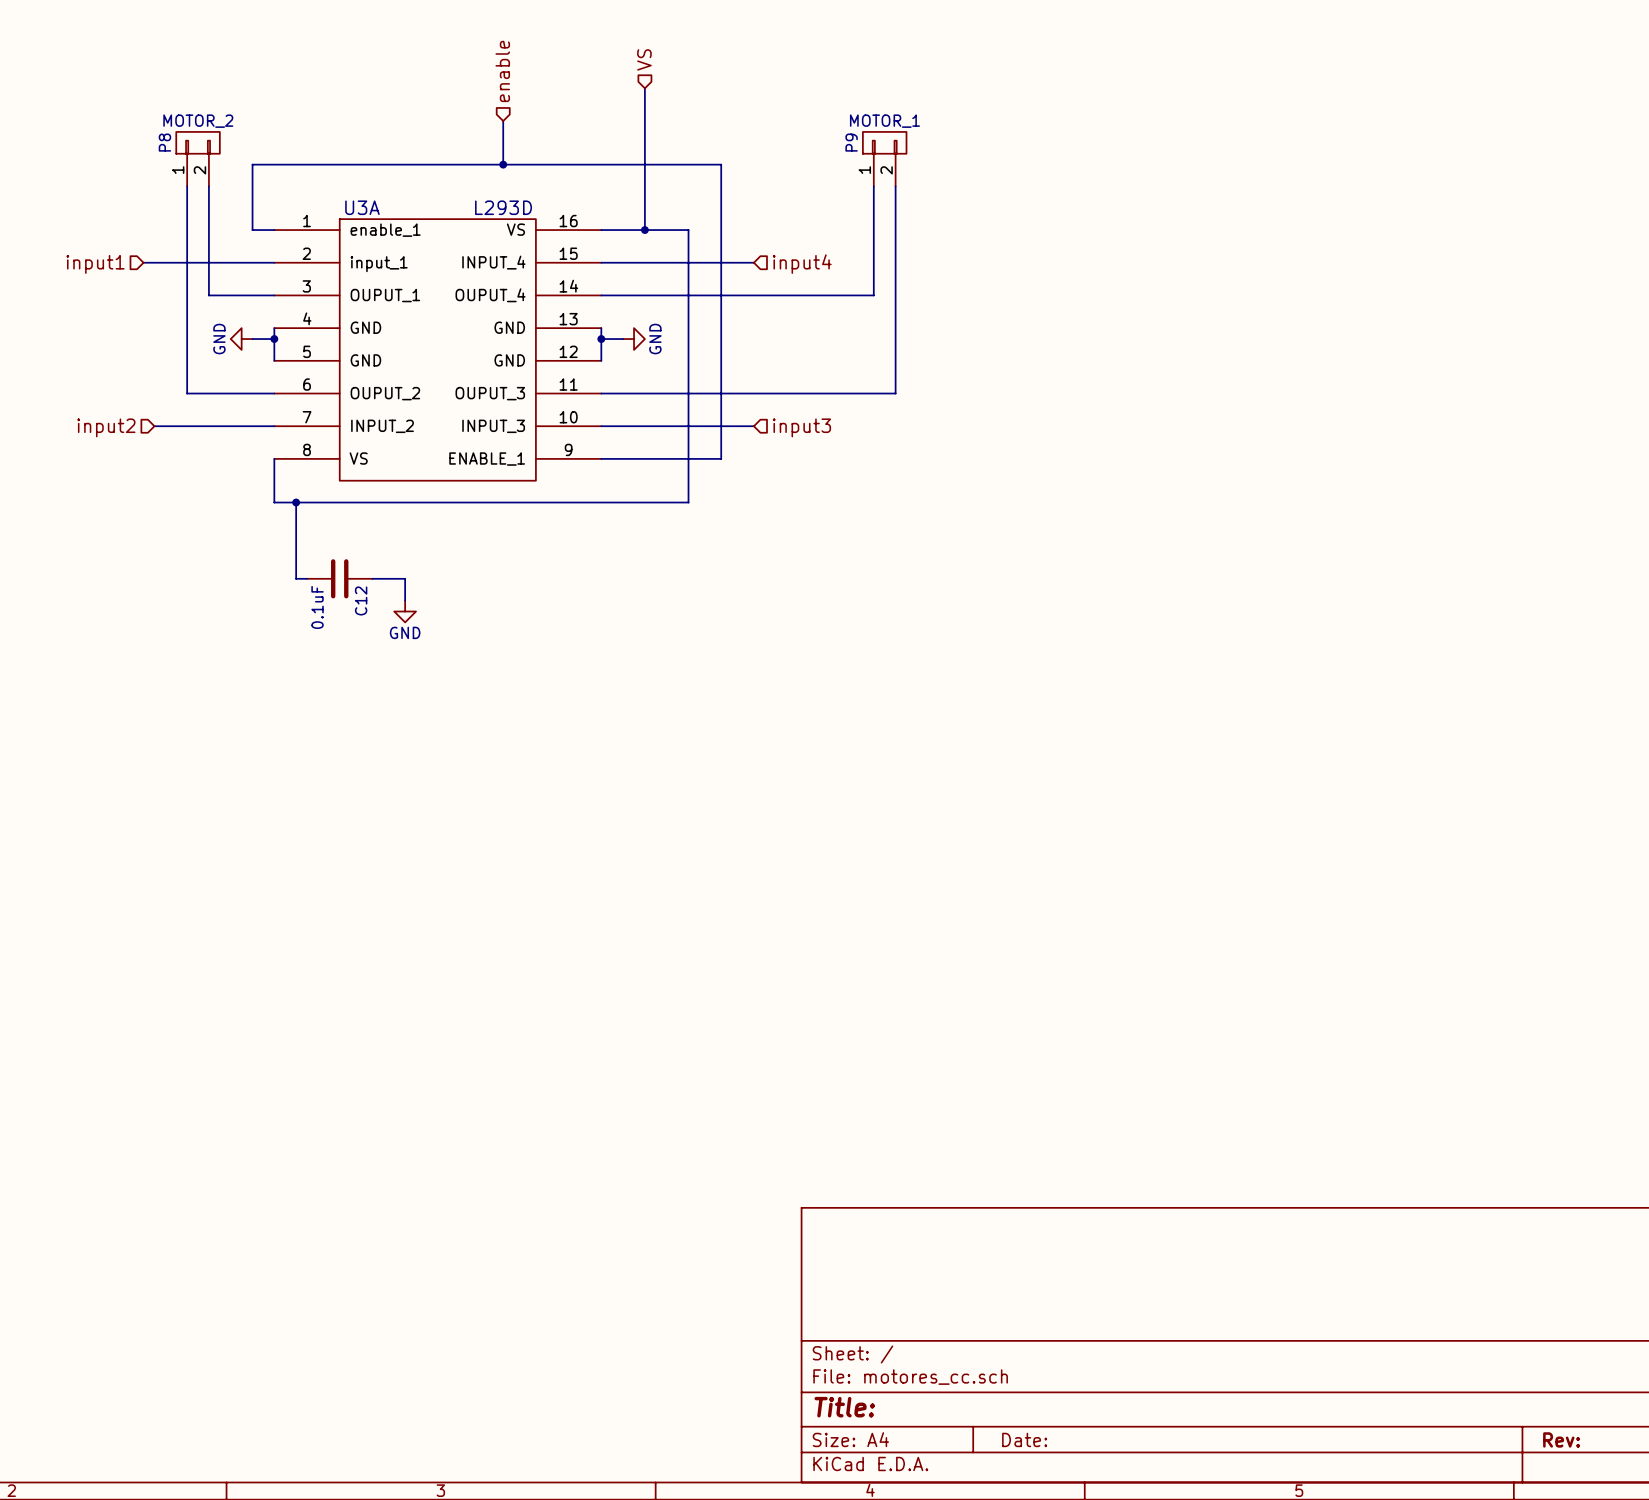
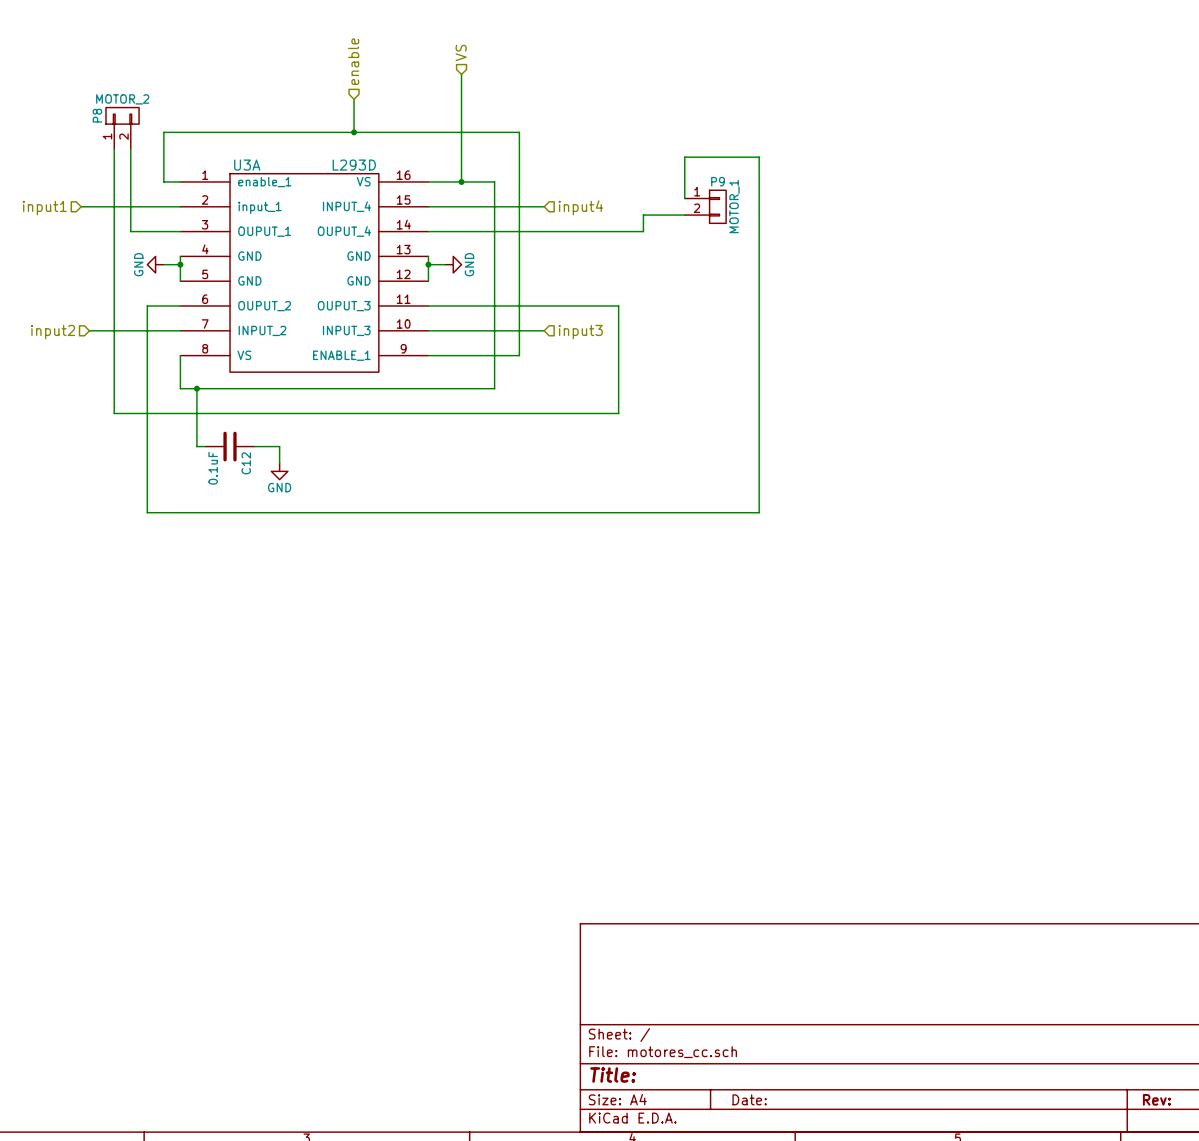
P9 rotation: 0° (884, 142) -> 90° clockwise (717, 206)
P9 position: (884, 159) -> (705, 206)
wire: (873, 186) (873, 295) -> (684, 215) (643, 215) (643, 231) (635, 231)
wire: (895, 186) (895, 393) (852, 393) -> none
wire: none -> (684, 198) (684, 157) (759, 157) (759, 512) (147, 512) (147, 306)
wire: (187, 393) (230, 393) -> (114, 306) (114, 413) (618, 413) (618, 306)

